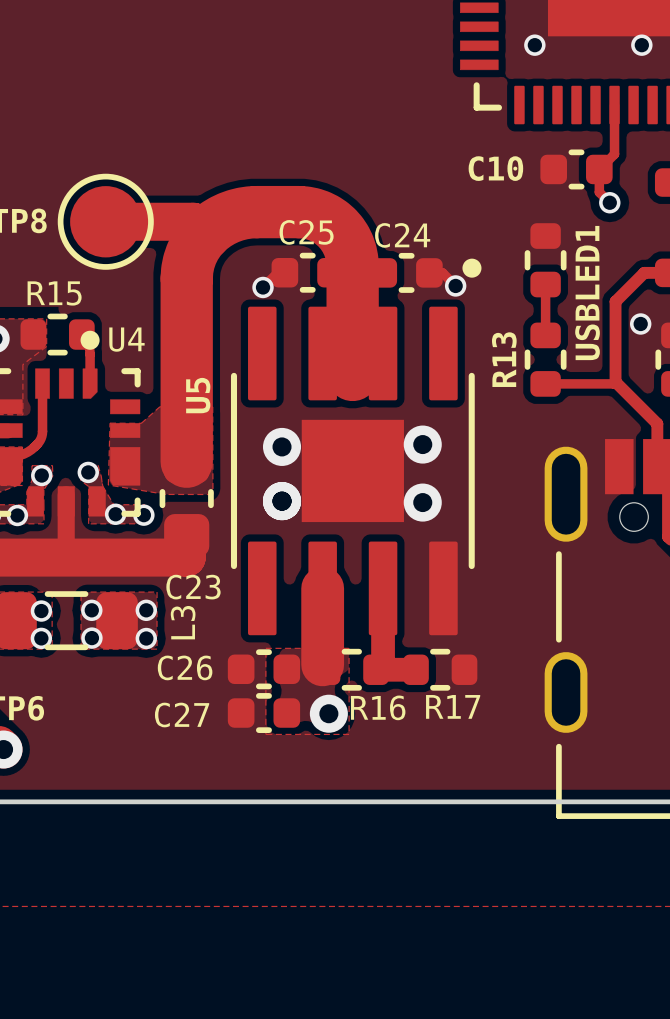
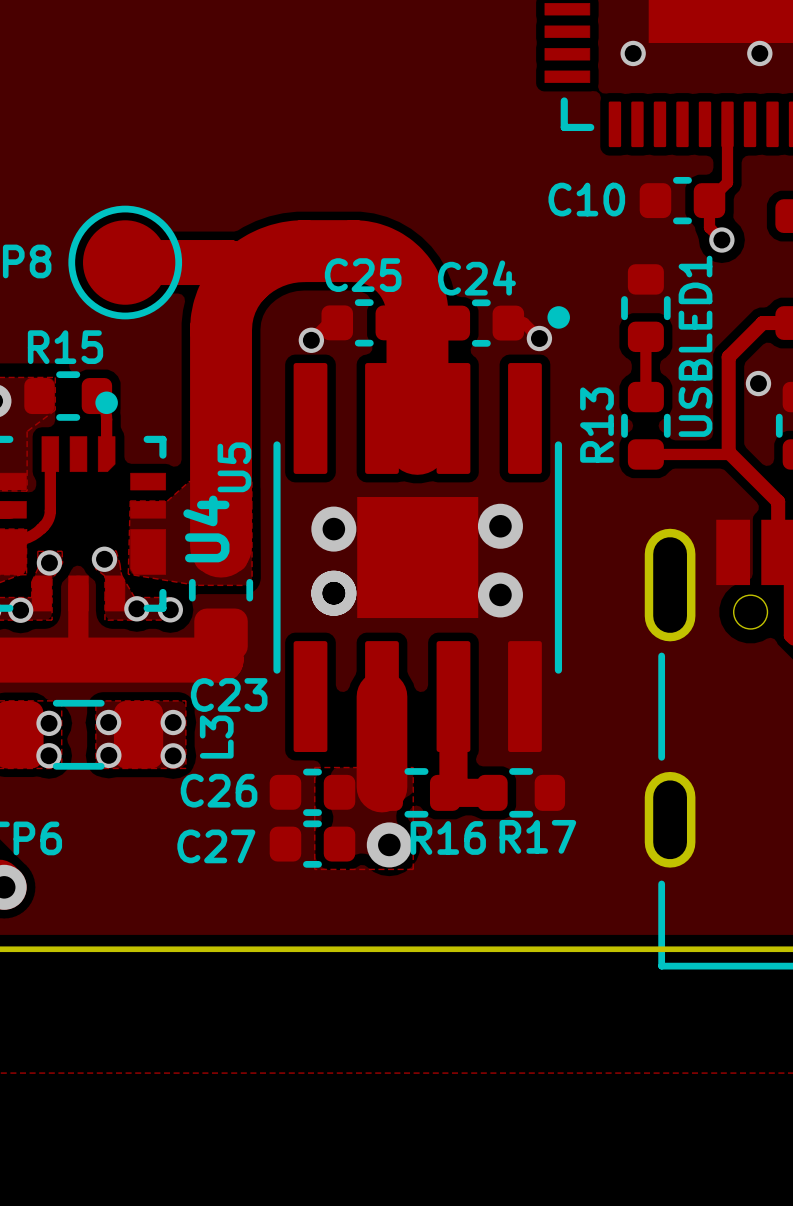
U4 name rotation: 0° (126, 339) -> 90° counterclockwise (206, 528)
U4 name position: U4 (126, 339) -> U4 (206, 528)

